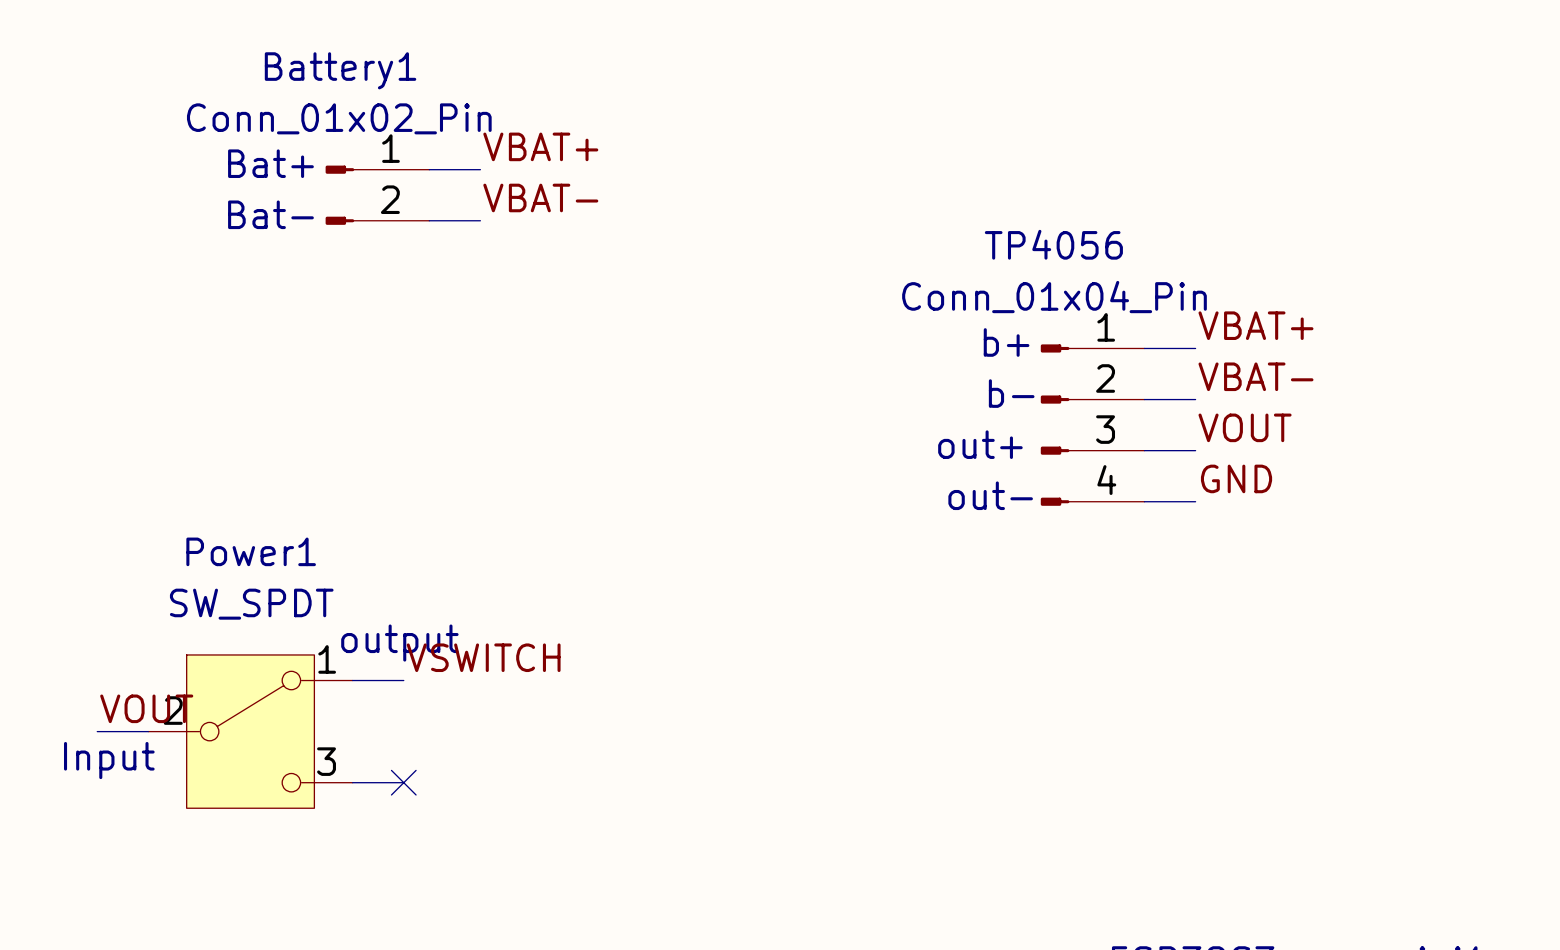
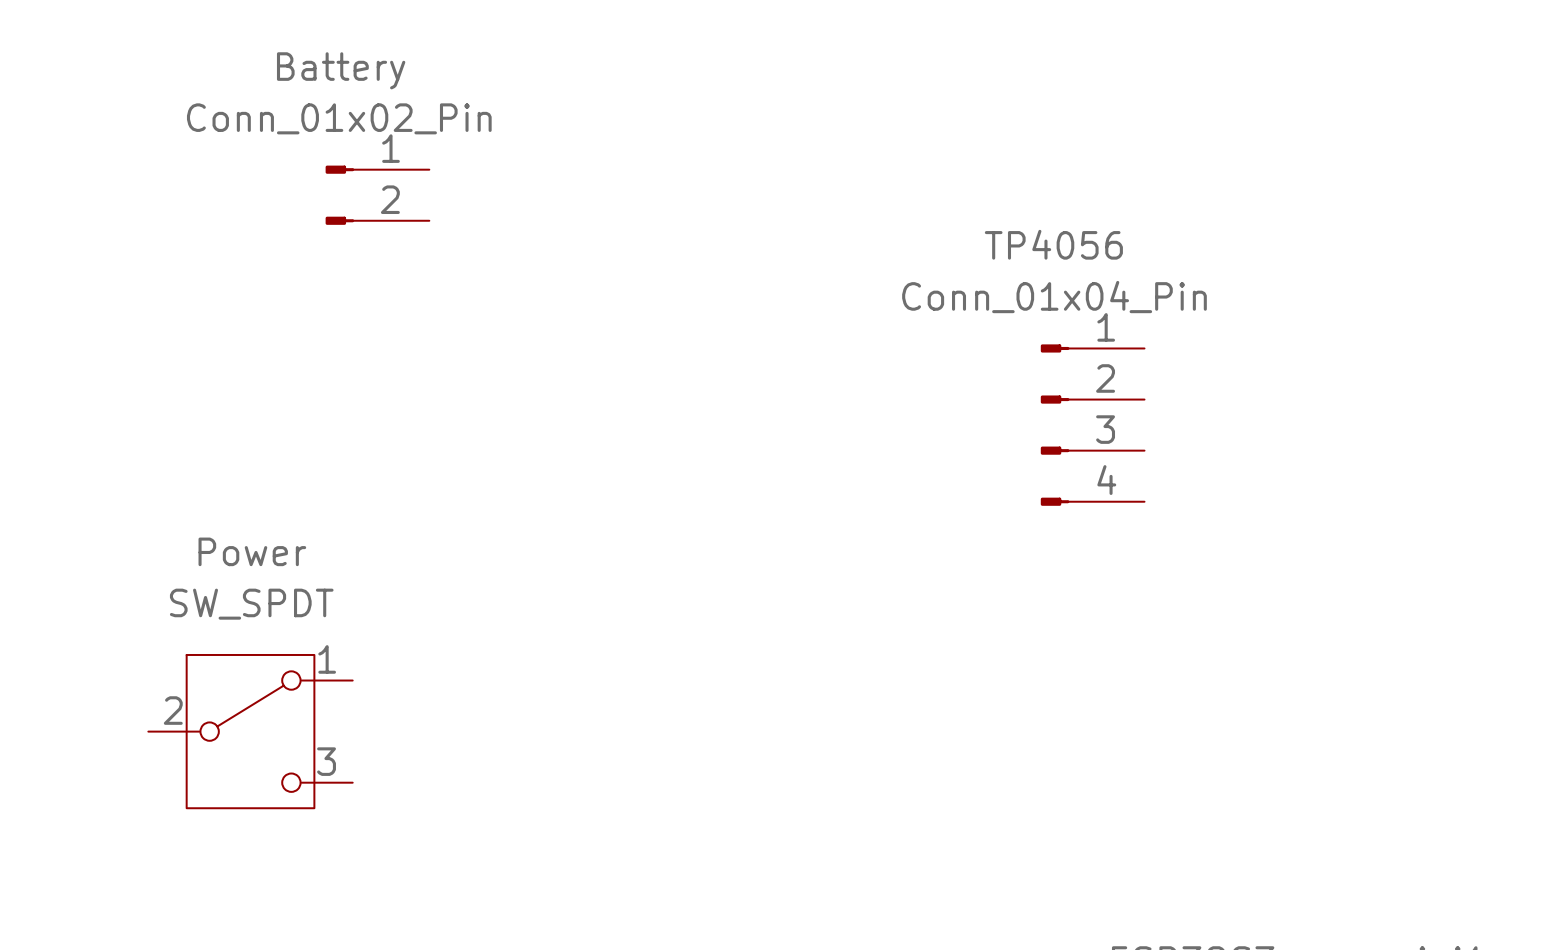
Battery1 name: Battery1 (340, 70) -> Battery (341, 70)
label: VBAT+ (540, 146) -> none
text: Bat+ (270, 163) -> none
wire: (429, 169) (480, 169) -> none
label: VBAT- (540, 197) -> none
text: Bat- (270, 214) -> none
wire: (429, 220) (480, 220) -> none
label: VBAT+ (1255, 325) -> none
text: b+ (1006, 342) -> none
wire: (1144, 348) (1195, 348) -> none
label: VBAT- (1255, 376) -> none
text: b- (1011, 393) -> none
wire: (1144, 399) (1195, 399) -> none
label: VOUT (1245, 427) -> none
text: out+ (980, 444) -> none
wire: (1144, 450) (1195, 450) -> none
label: GND (1236, 478) -> none
text: out- (990, 495) -> none
wire: (1144, 501) (1195, 501) -> none
Power1 name: Power1 (251, 551) -> Power (252, 551)
text: output (399, 643) -> none
label: VSWITCH (483, 657) -> none
wire: (352, 680) (403, 680) -> none
label: VOUT (146, 708) -> none
wire: (97, 731) (148, 731) -> none
text: Input (109, 760) -> none
wire: (352, 782) (403, 782) -> none
no-connect mark: (403, 782) -> none

